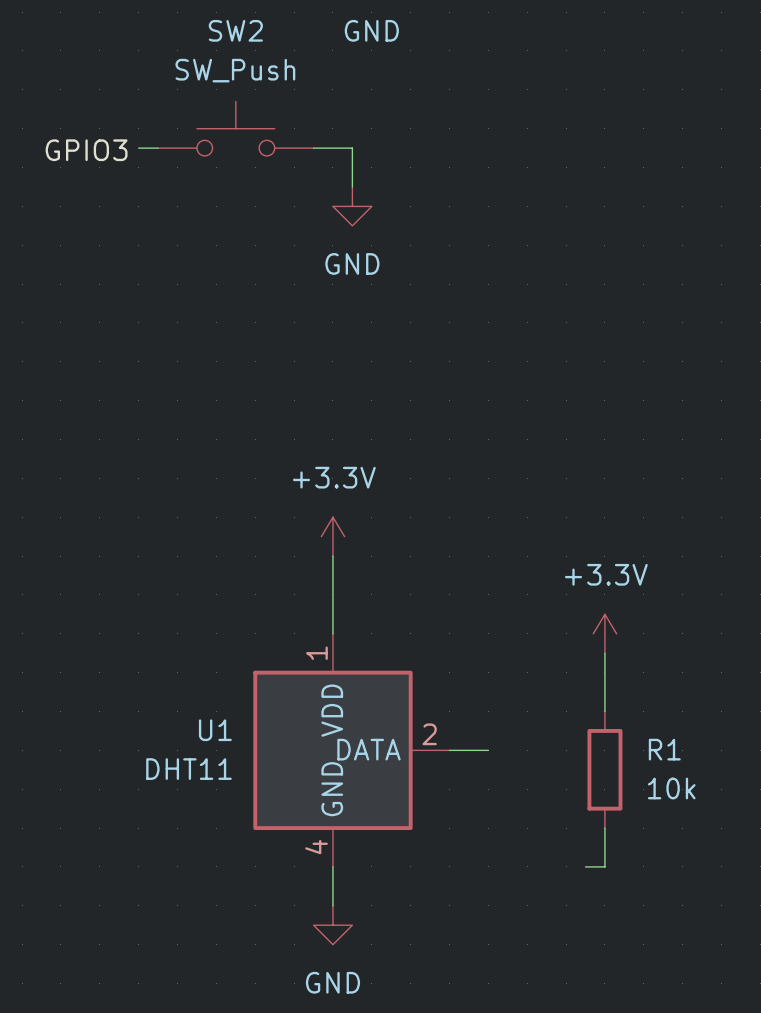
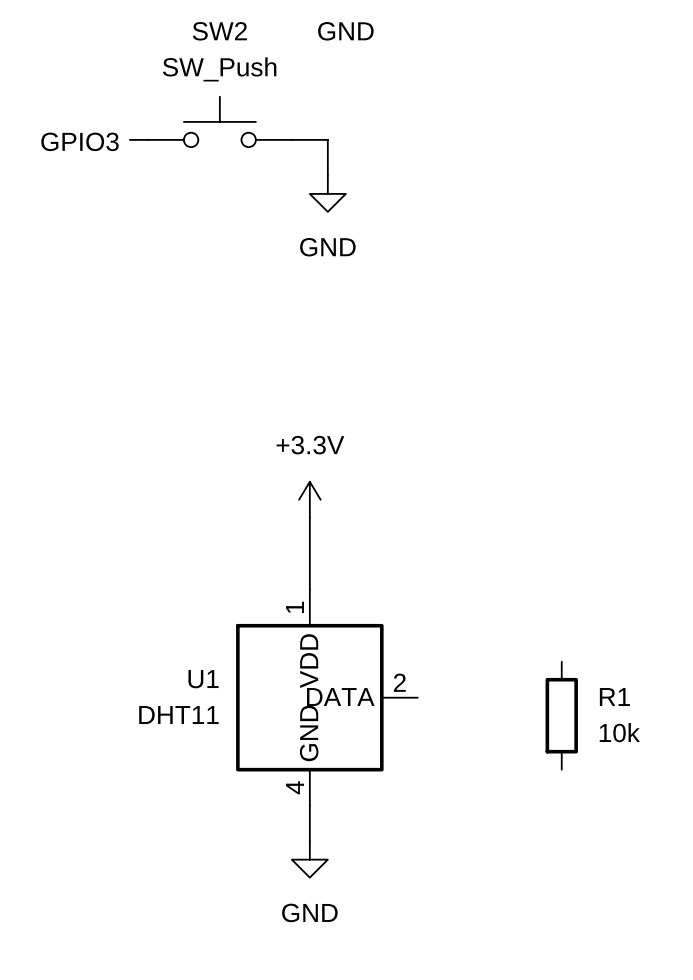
power symbol: +3.3V (604, 633) -> none
wire: (604, 653) (604, 711) -> none
wire: (449, 750) (488, 750) -> none
wire: (604, 828) (604, 866) (585, 866) -> none

